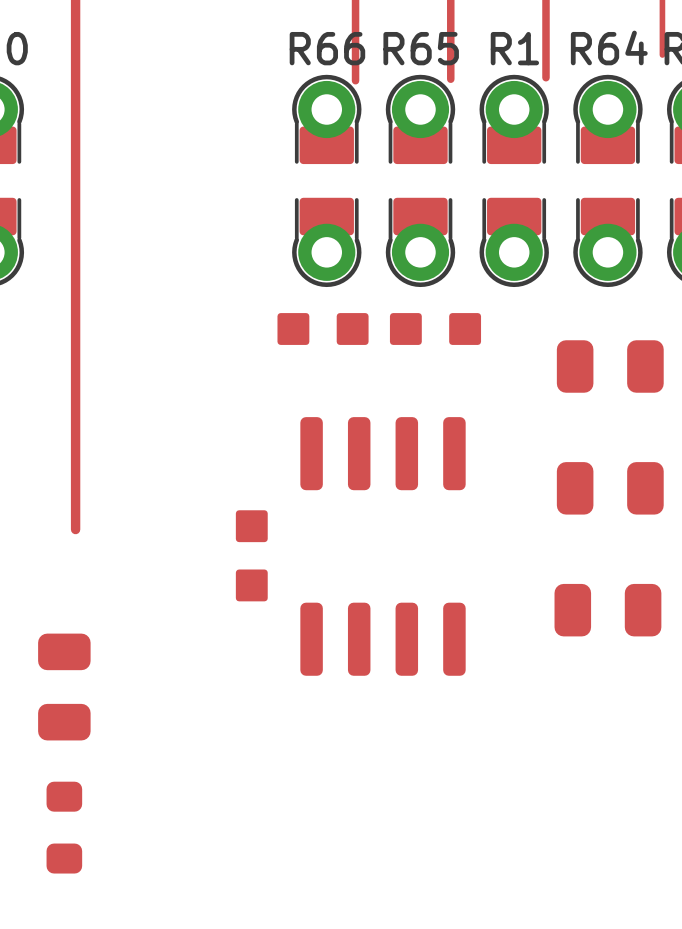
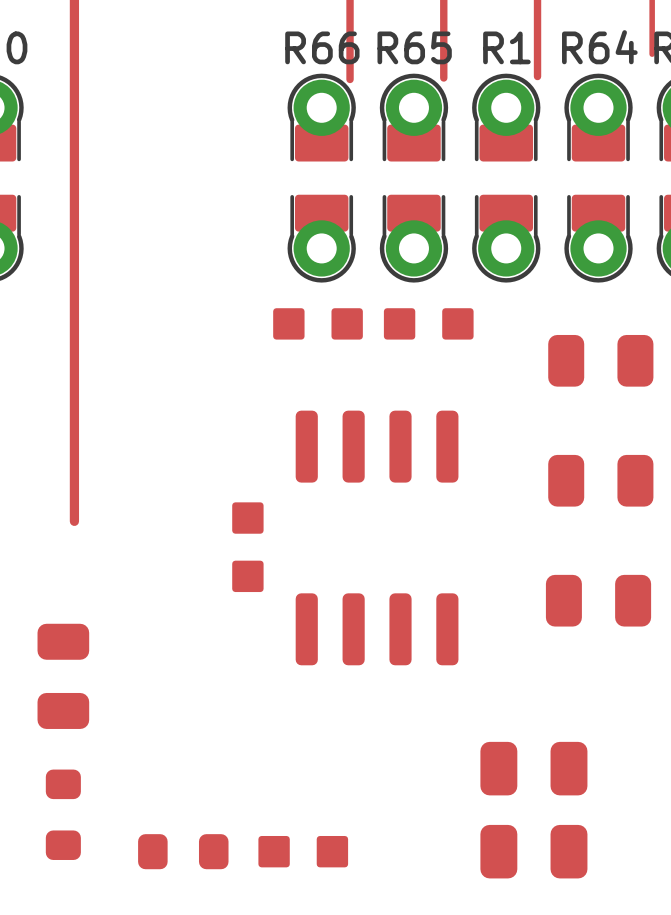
part: none -> (533, 768)
part: none -> (183, 851)
part: none -> (303, 851)
part: none -> (533, 851)

